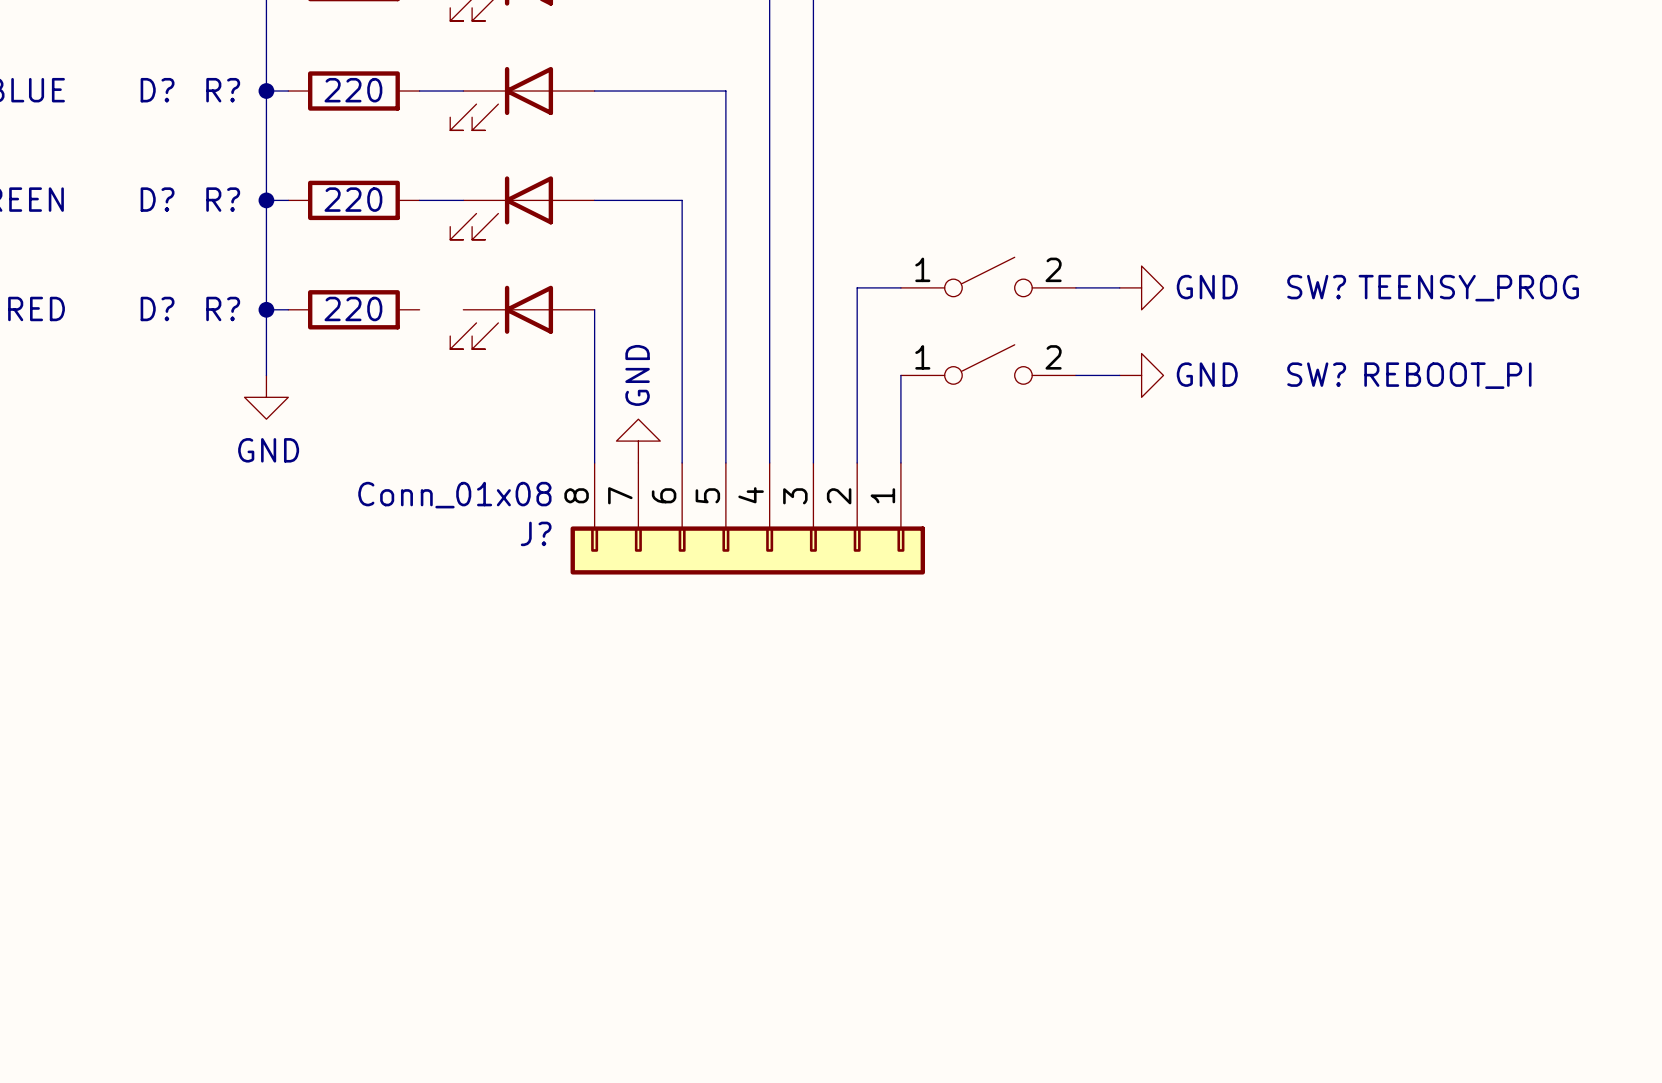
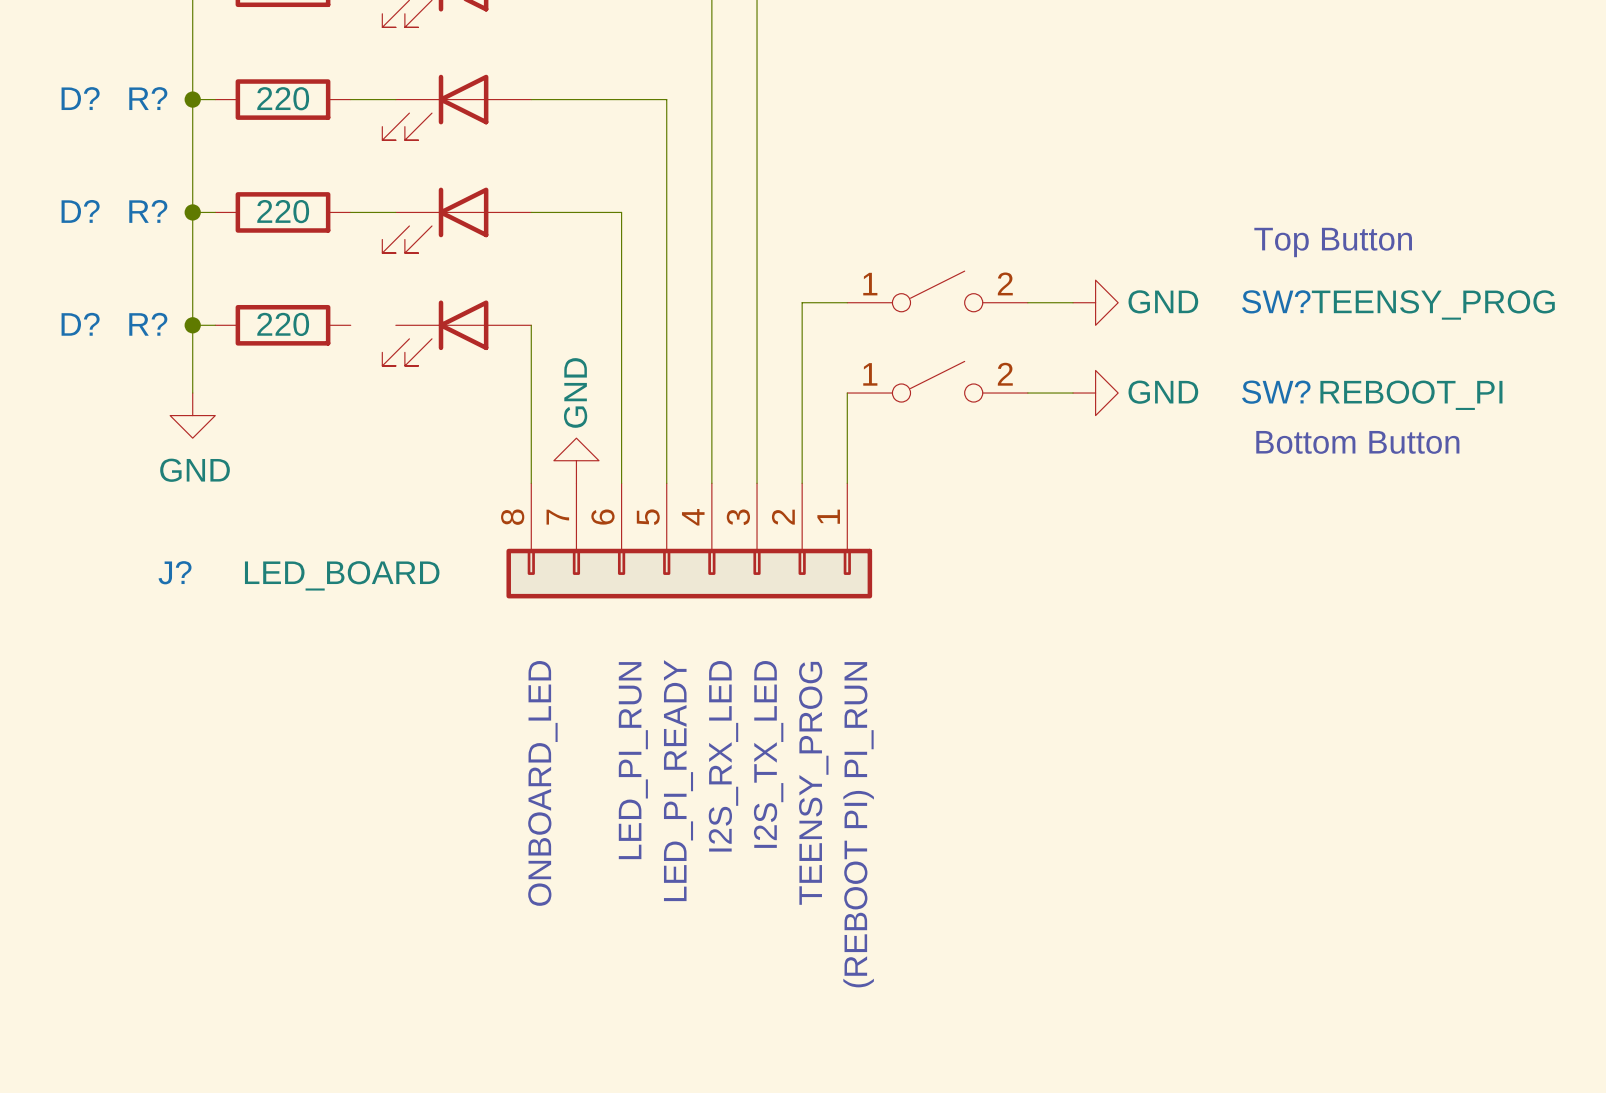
text: none -> Top Button (1333, 242)
text: none -> Bottom Button (1357, 442)
J? value: Conn_01x08 (454, 495) -> LED_BOARD (342, 575)
J? name position: J? (536, 533) -> J? (175, 572)
text: none -> I2S_TX_LED (768, 754)
text: none -> I2S_RX_LED (723, 756)
text: none -> LED_PI_RUN (633, 760)
text: none -> LED_PI_READY (678, 780)
text: none -> TEENSY_PROG (813, 783)
text: none -> ONBOARD_LED (542, 783)
text: none -> (REBOOT PI) PI_RUN (858, 824)

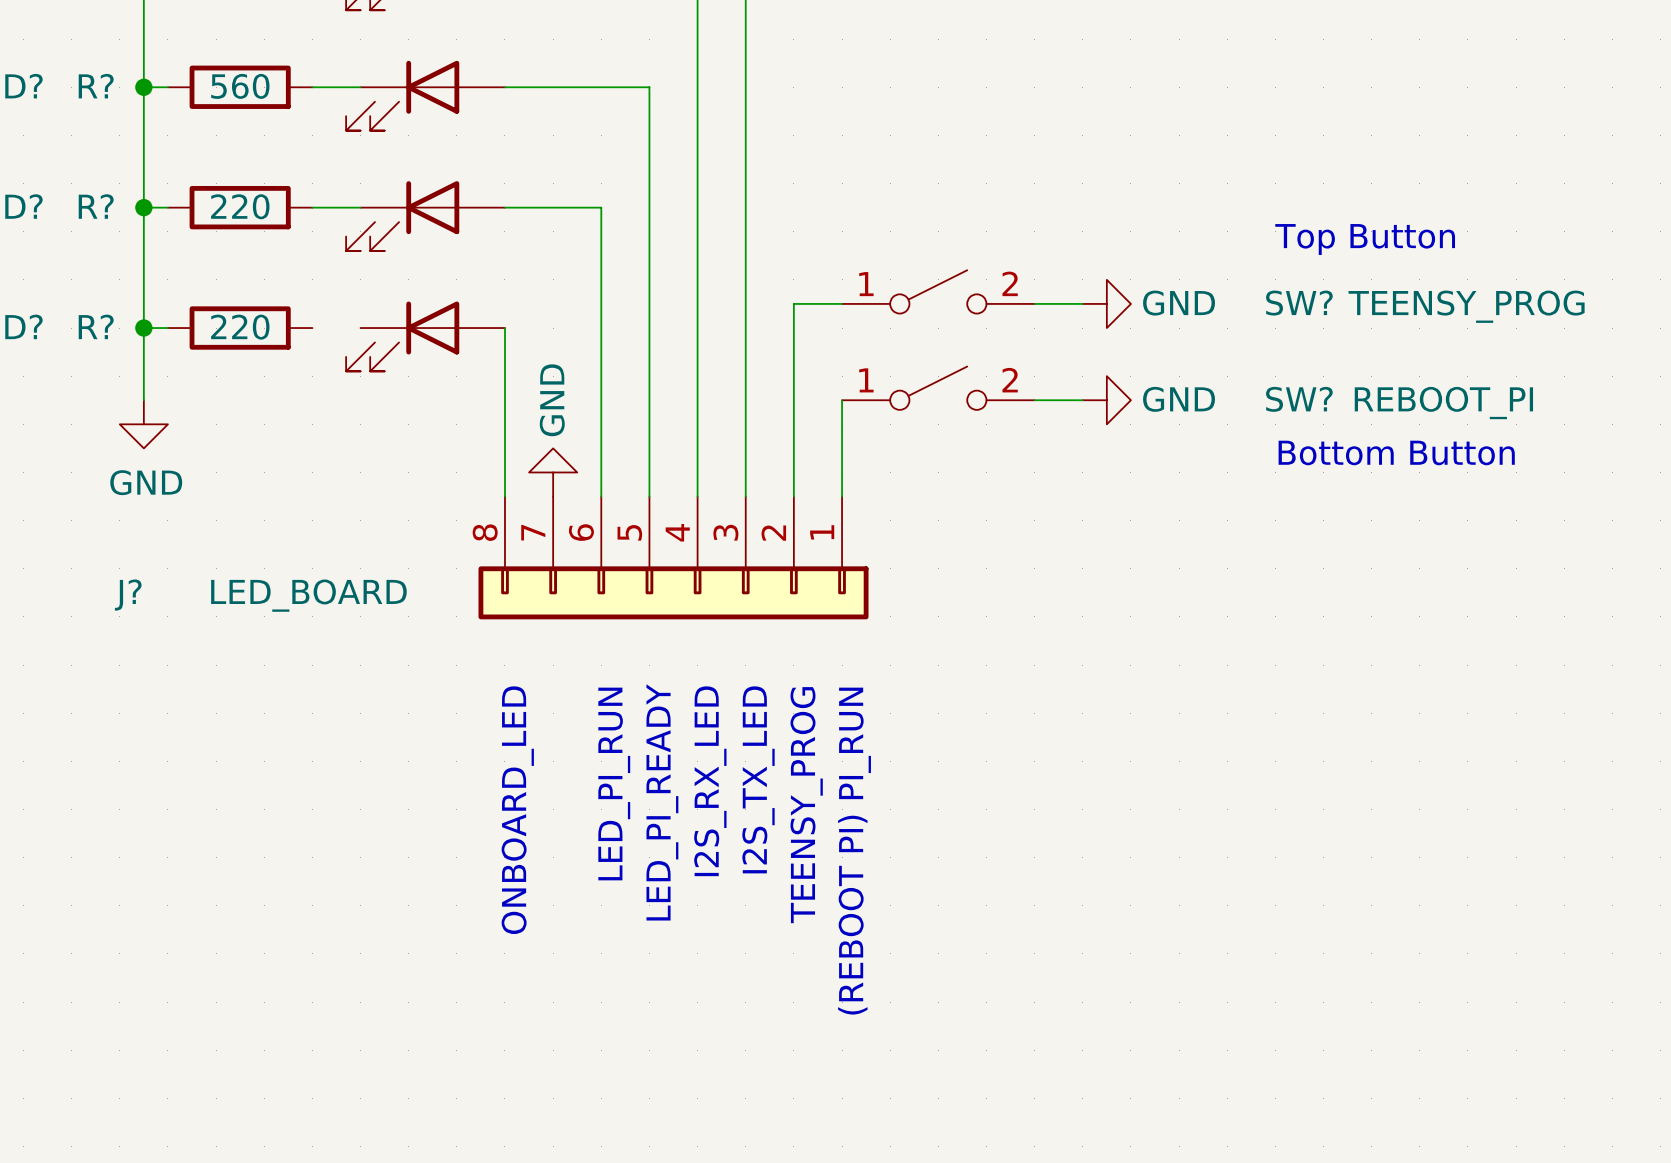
R? value: 220 (283, 98) -> 560 (240, 86)

